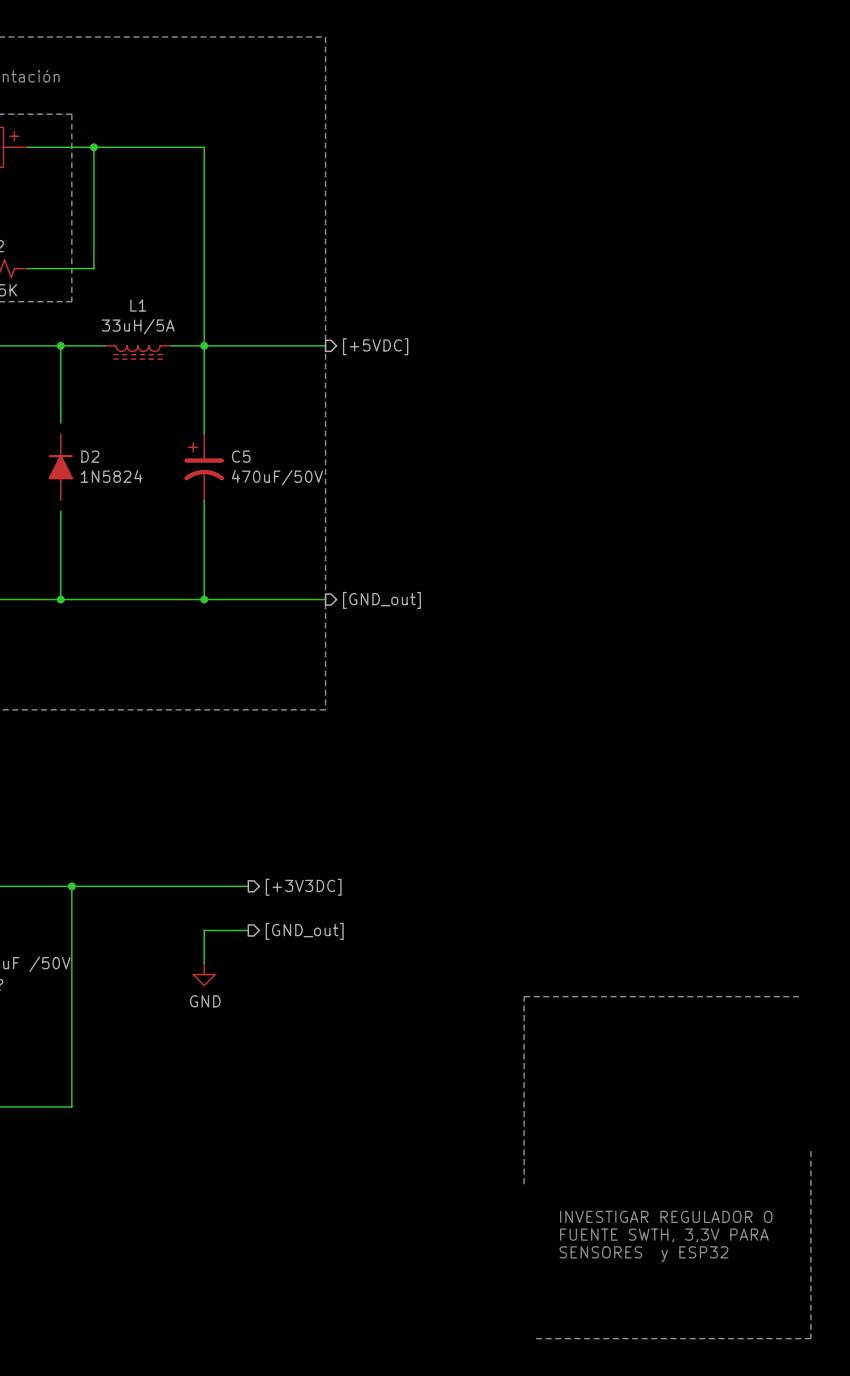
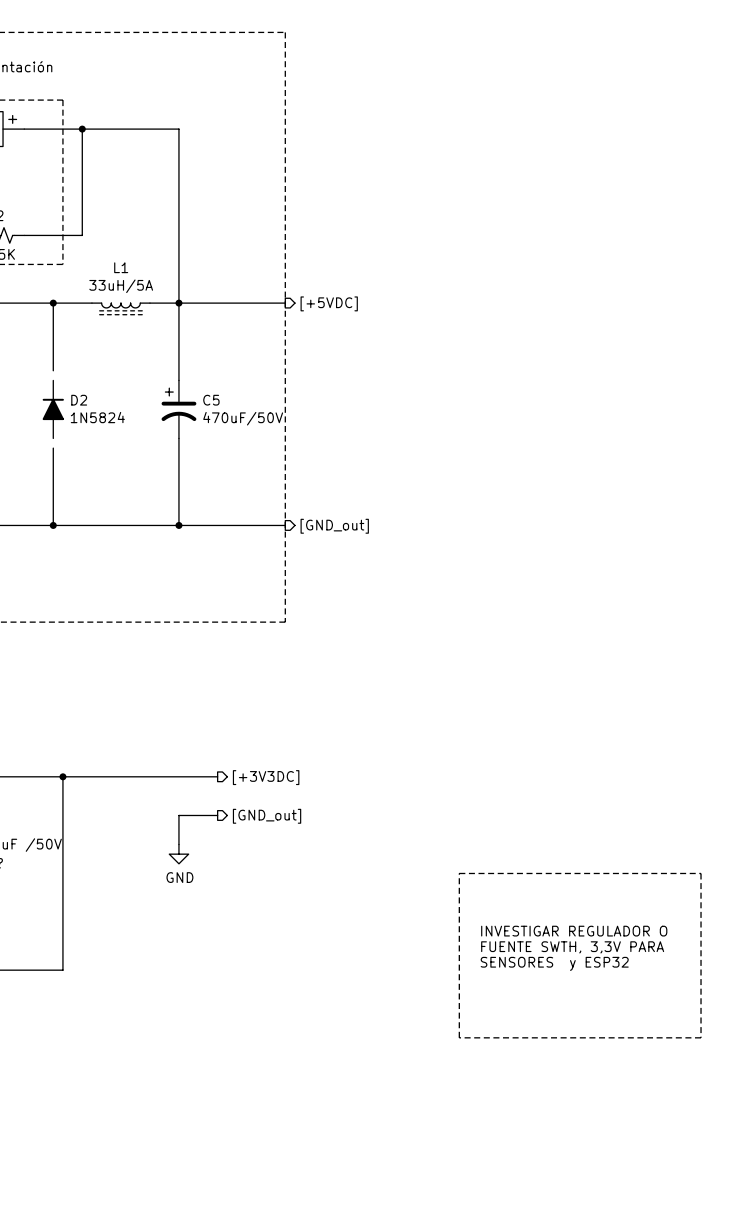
line: (810, 1151) (810, 1338) (535, 1338) -> (701, 873) (701, 1037) (459, 1037)
text position: INVESTIGAR REGULADOR O (666, 1216) -> INVESTIGAR REGULADOR O (574, 931)
text position: FUENTE SWTH, 3,3V PARA (664, 1235) -> FUENTE SWTH, 3,3V PARA (572, 947)
text position: SENSORES y ESP32 (643, 1254) -> SENSORES y ESP32 (554, 963)

